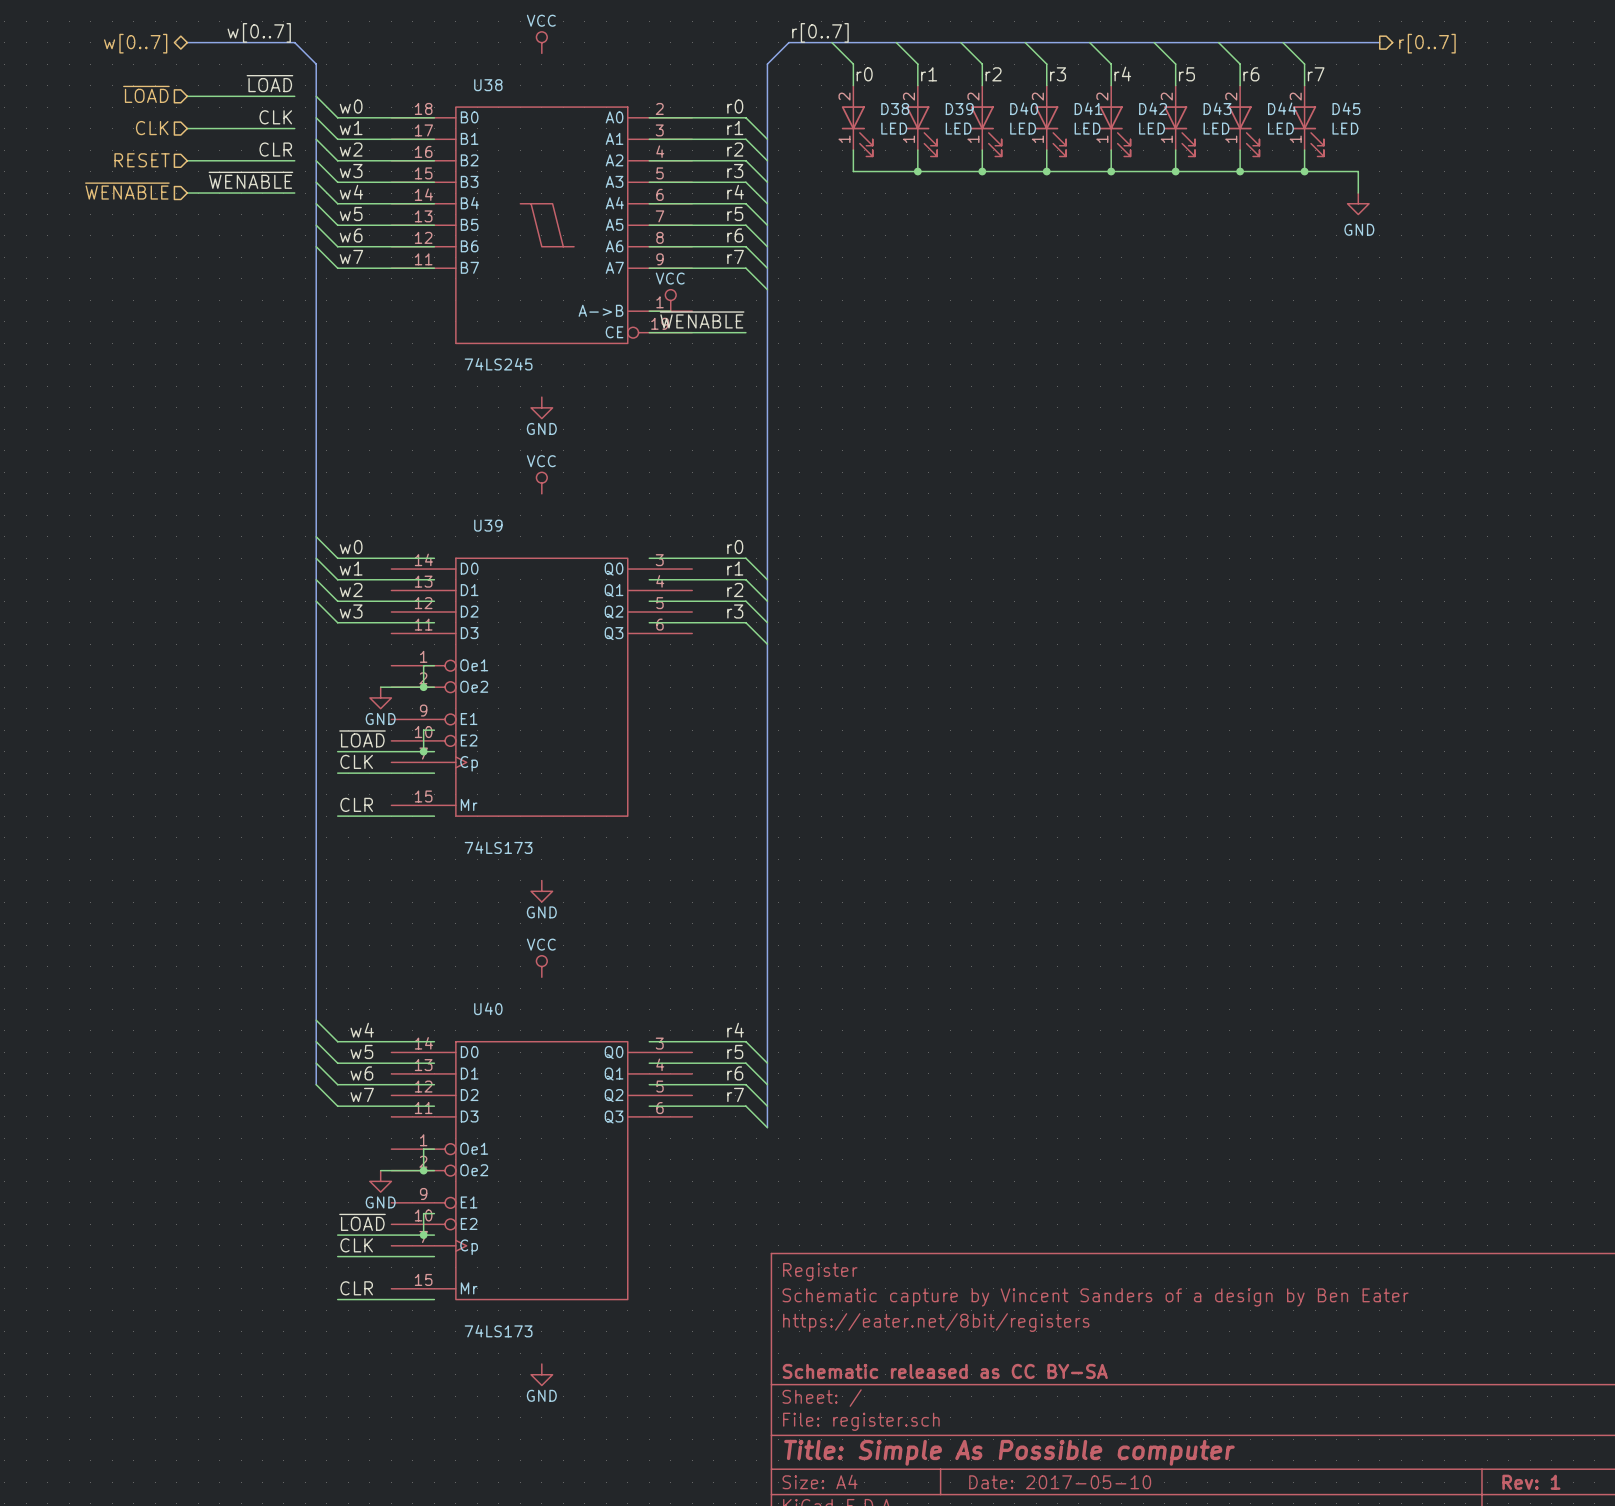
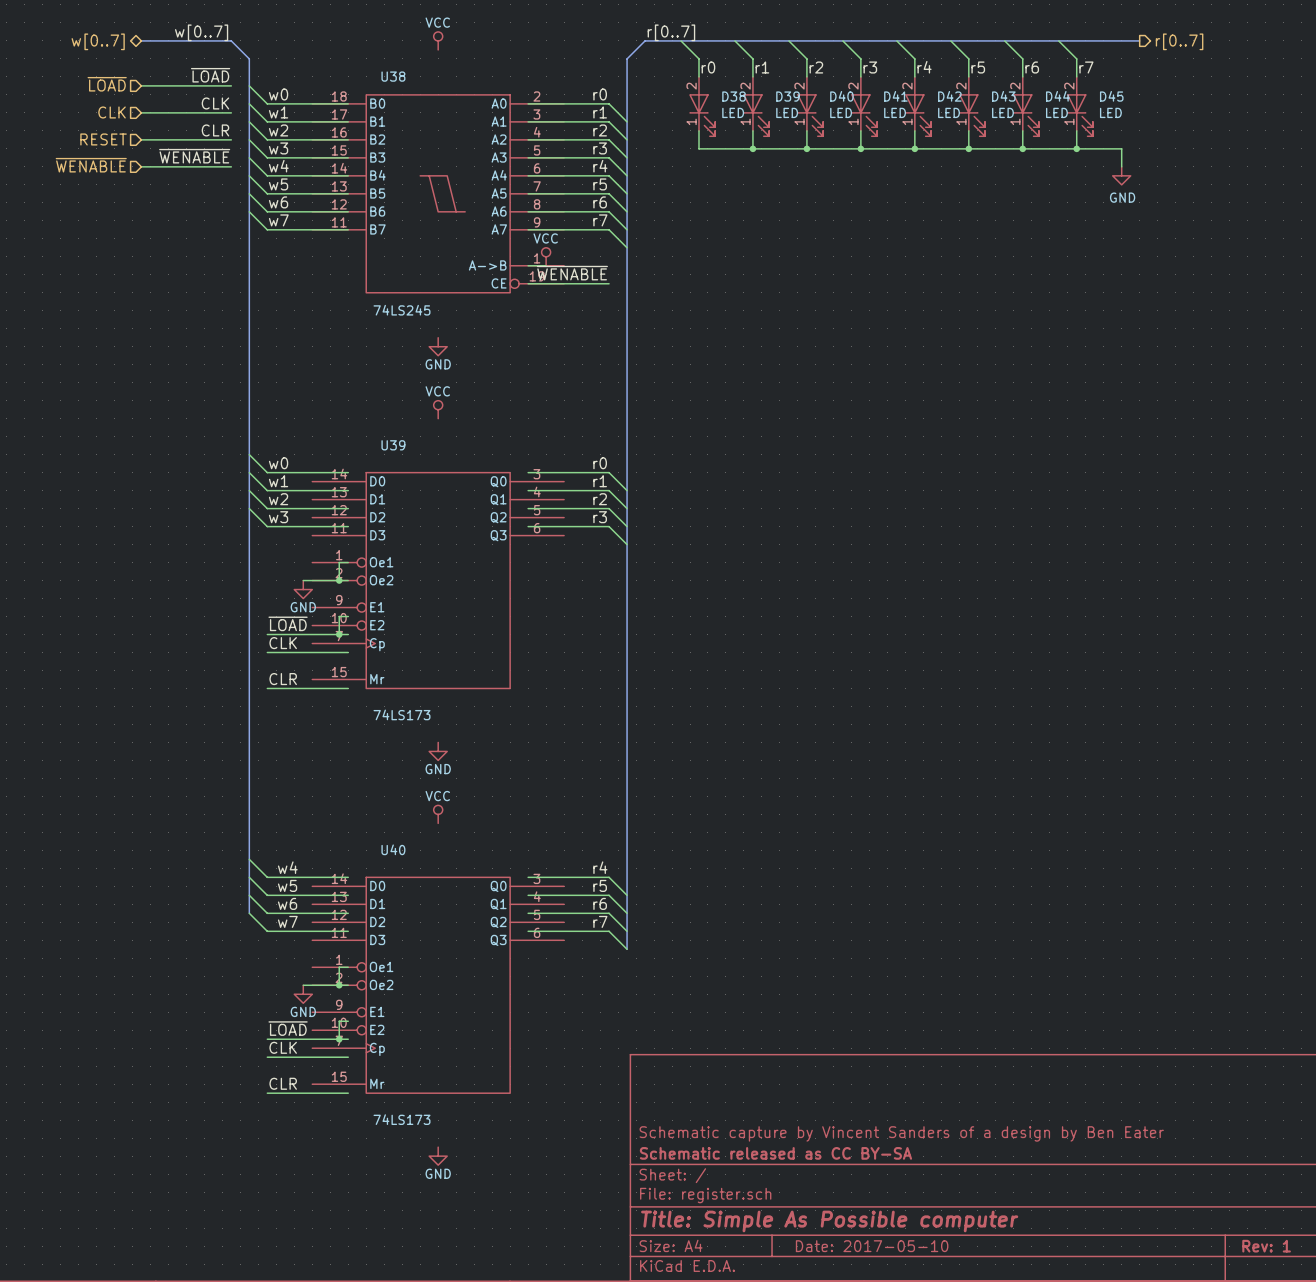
title block: Register (820, 1272) -> none
title block position: Schematic capture by Vincent Sanders of a design by Ben Eater (1095, 1297) -> Schematic capture by Vincent Sanders of a design by Ben Eater (901, 1133)
title block: https://eater.net/8bit/registers (936, 1322) -> none

